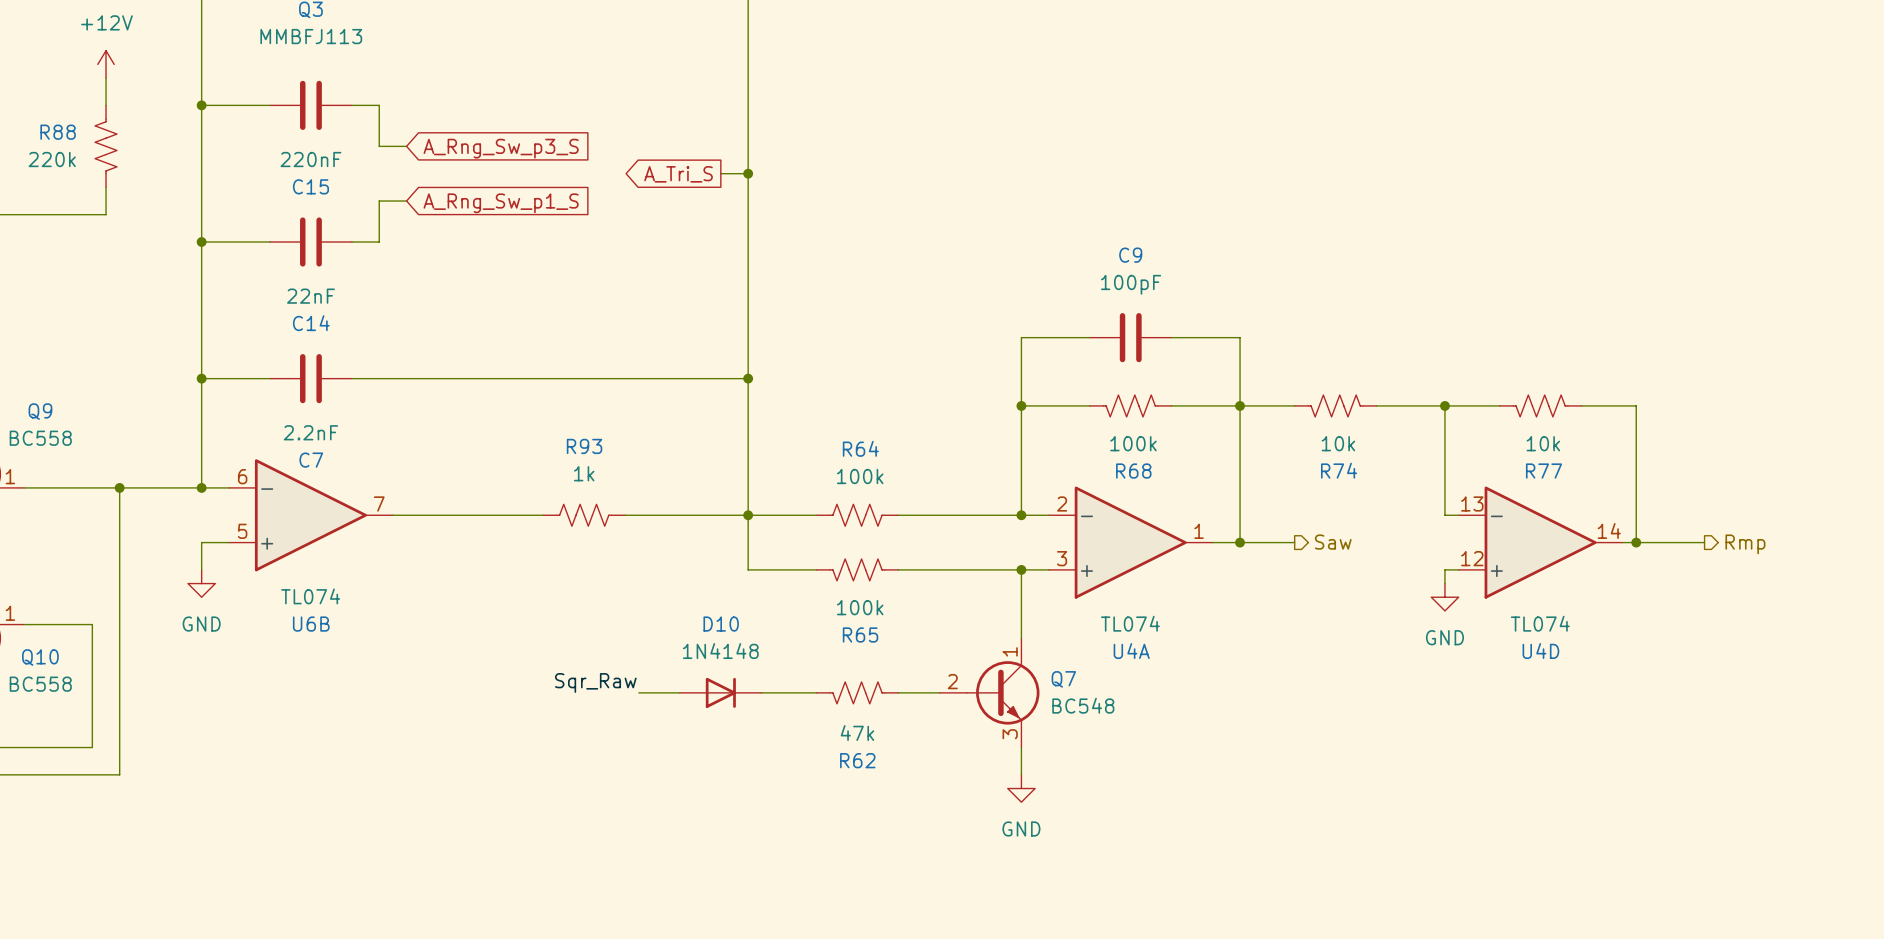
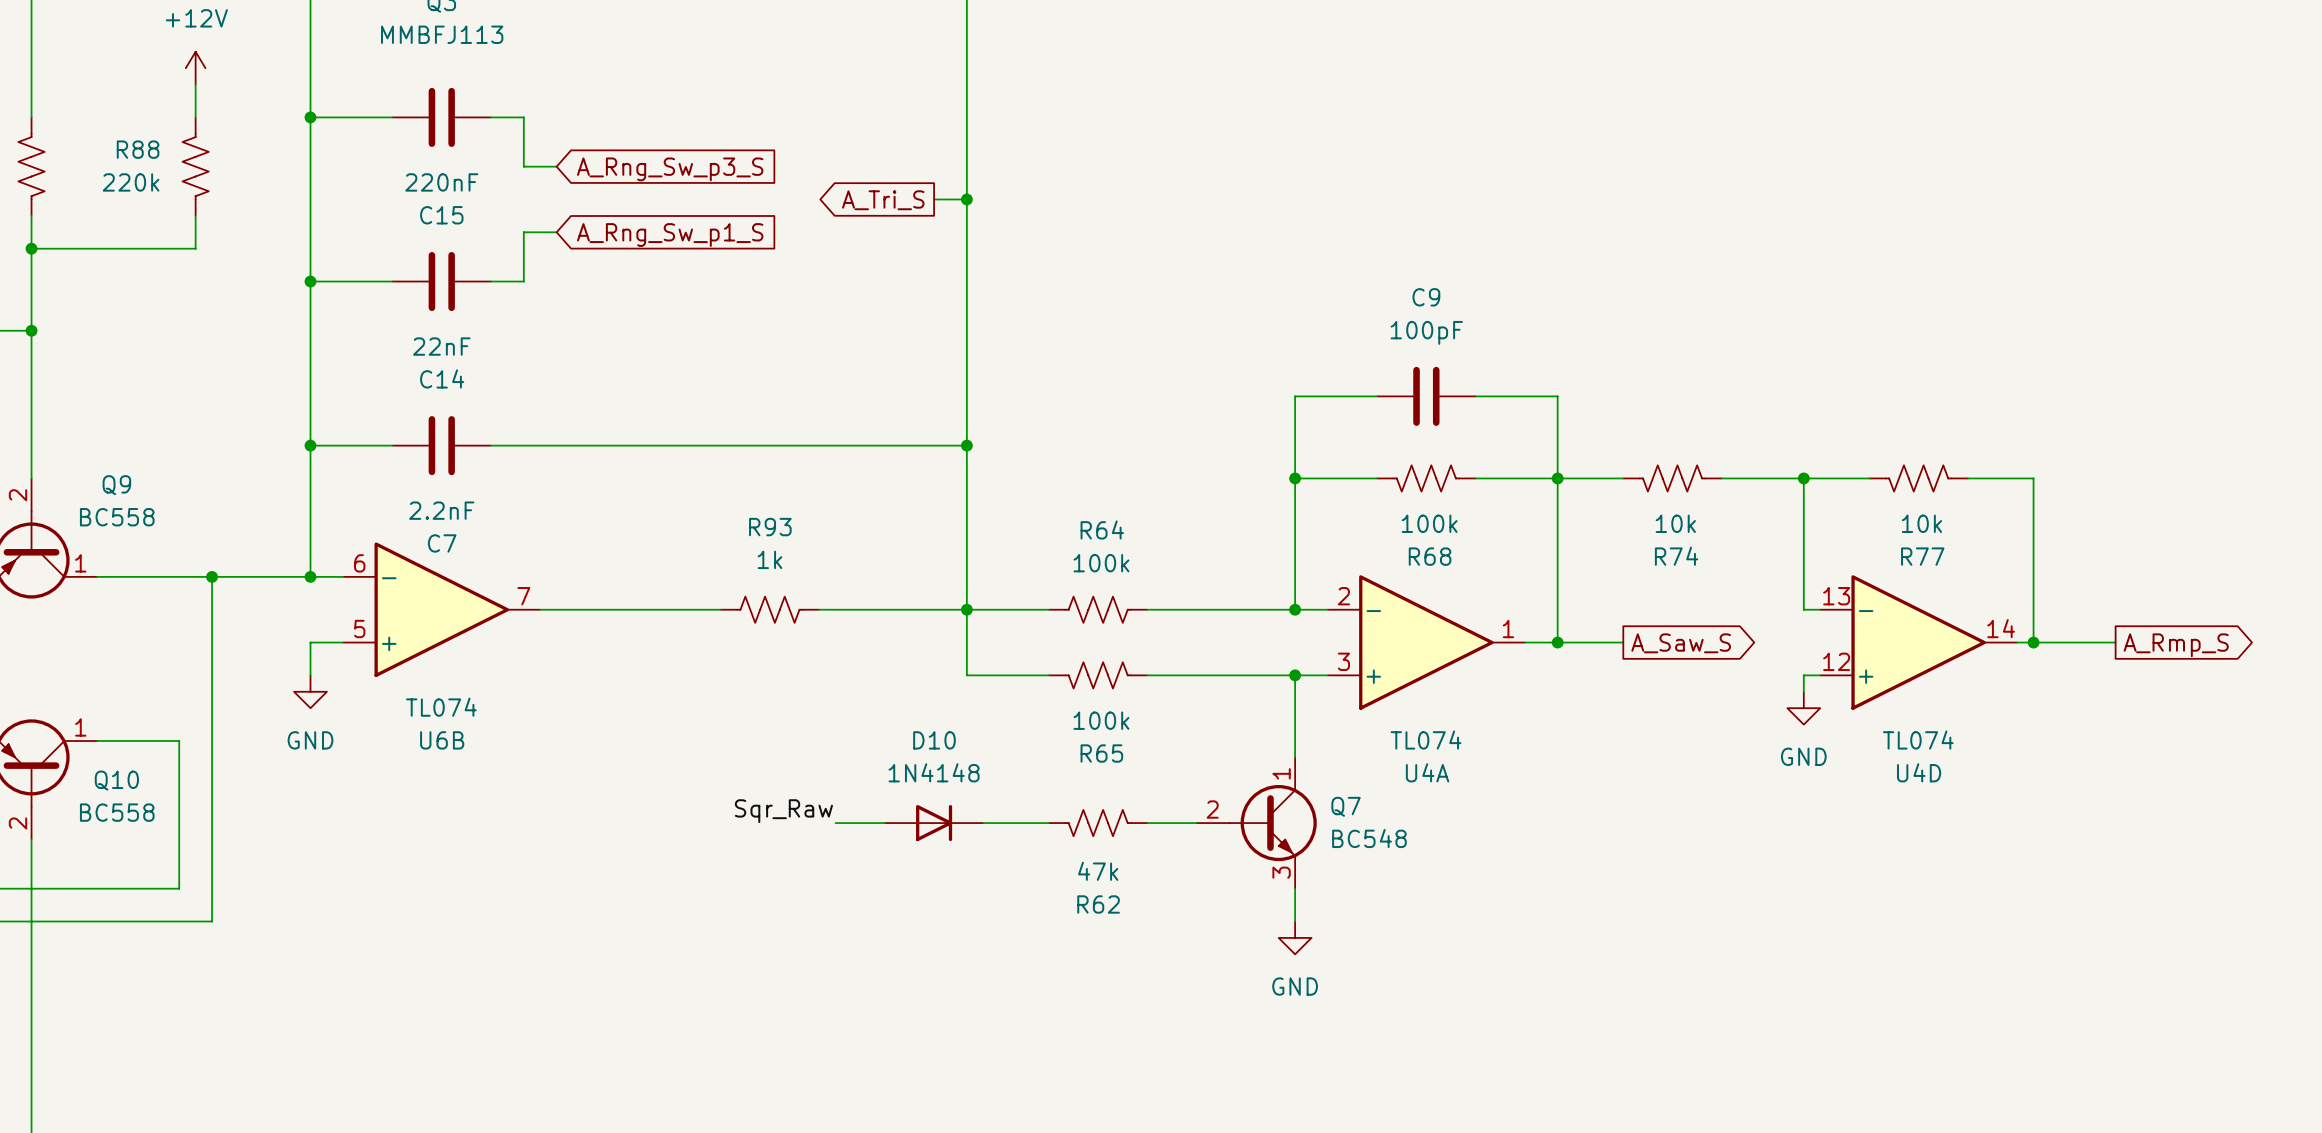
hierarchical label: Saw (1333, 542) -> none
global label: none -> A_Saw_S (1681, 643)
hierarchical label: Rmp (1745, 544) -> none
global label: none -> A_Rmp_S (2176, 645)

